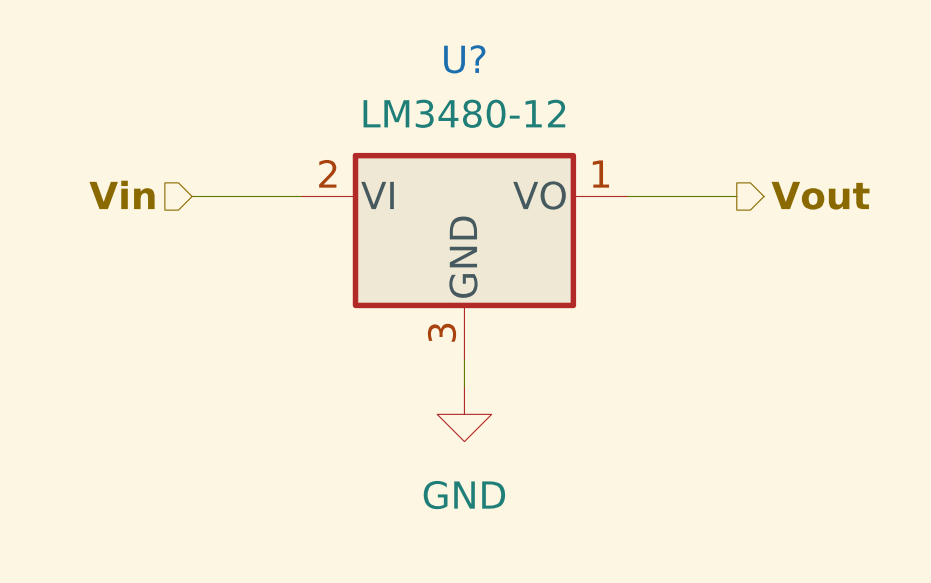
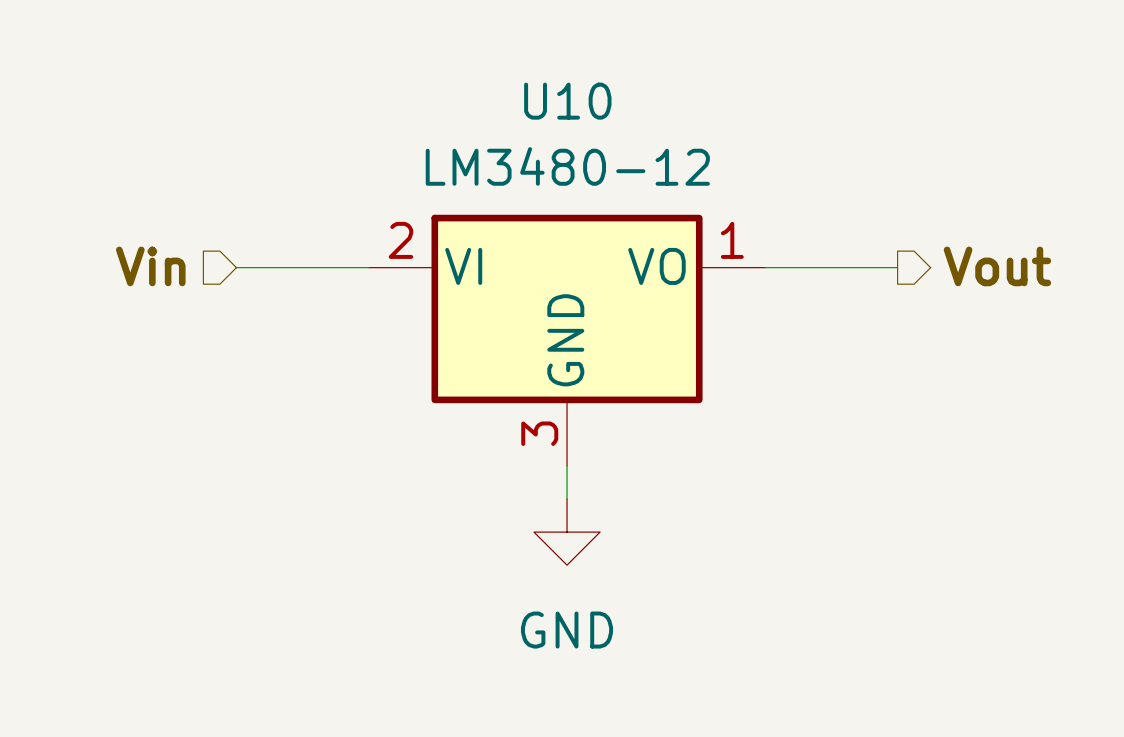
U? name: U? (464, 59) -> U10 (567, 101)

